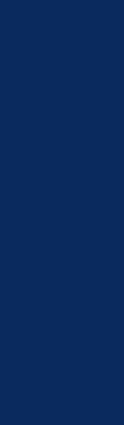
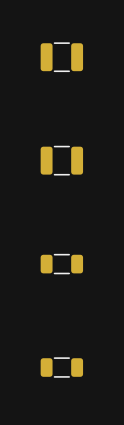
part: none -> (61, 57)
part: none -> (61, 160)
part: none -> (61, 264)
part: none -> (61, 367)

